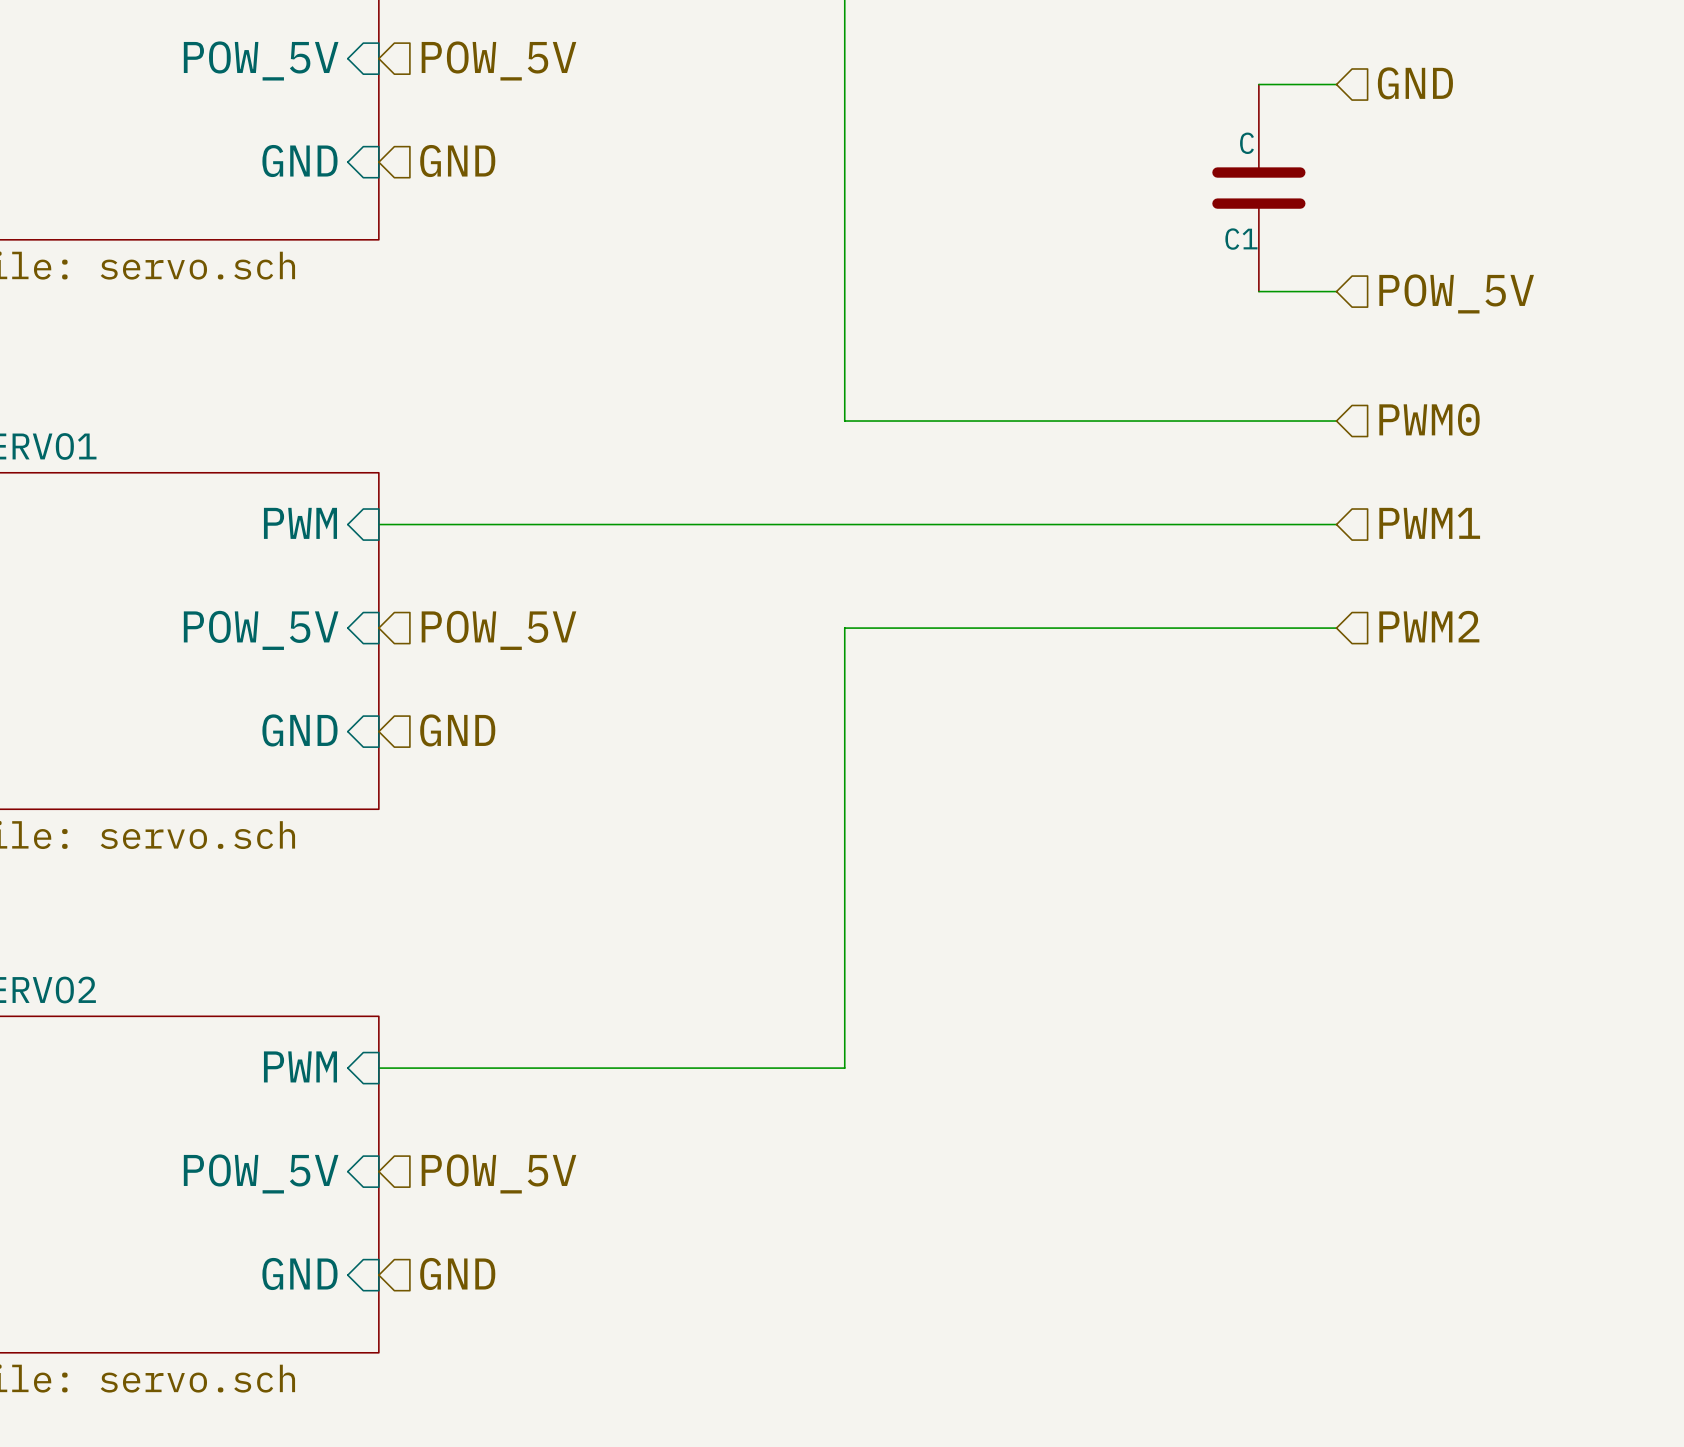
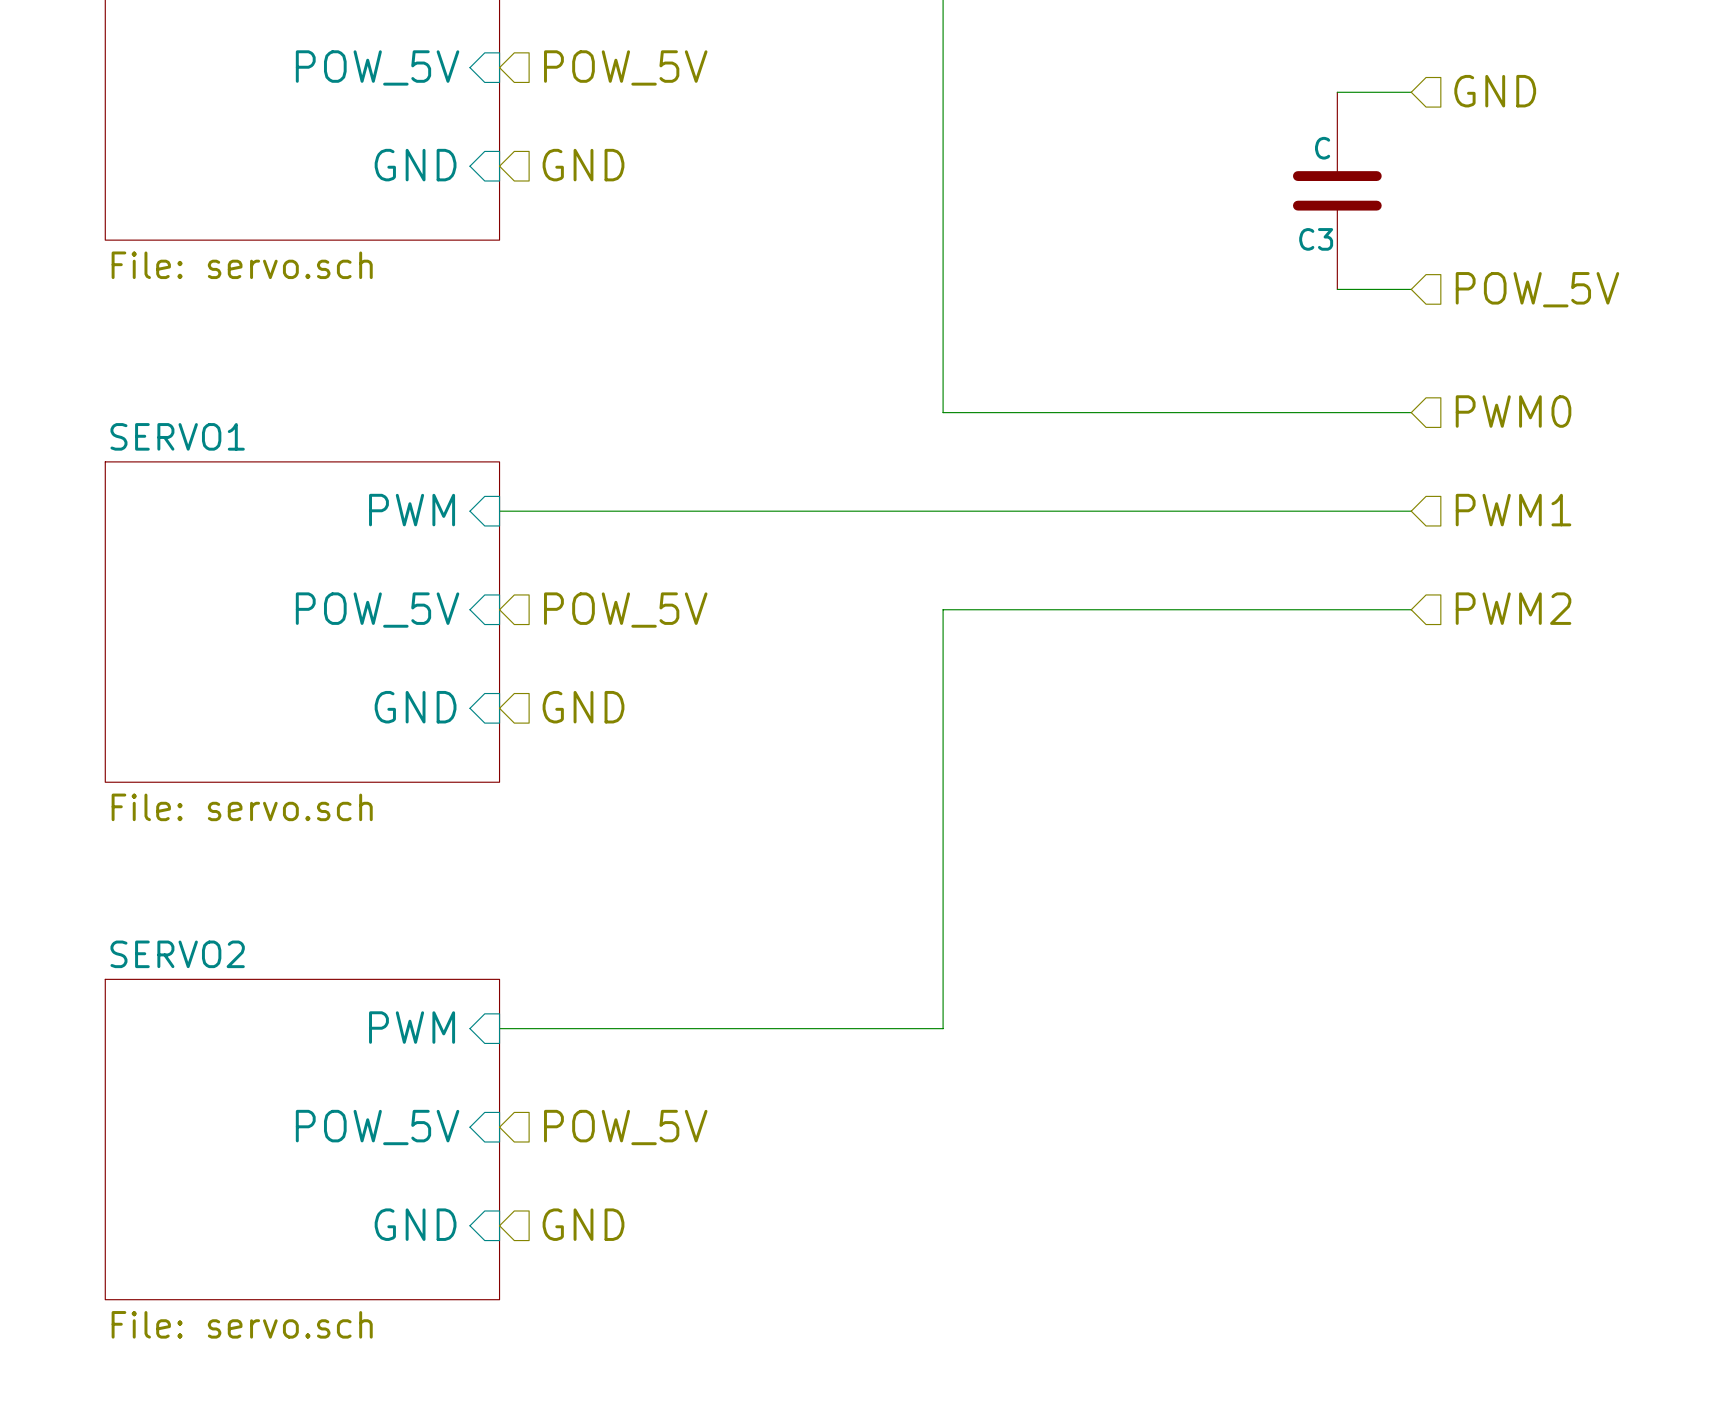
C1 name: C1 (1241, 239) -> C3 (1316, 239)

